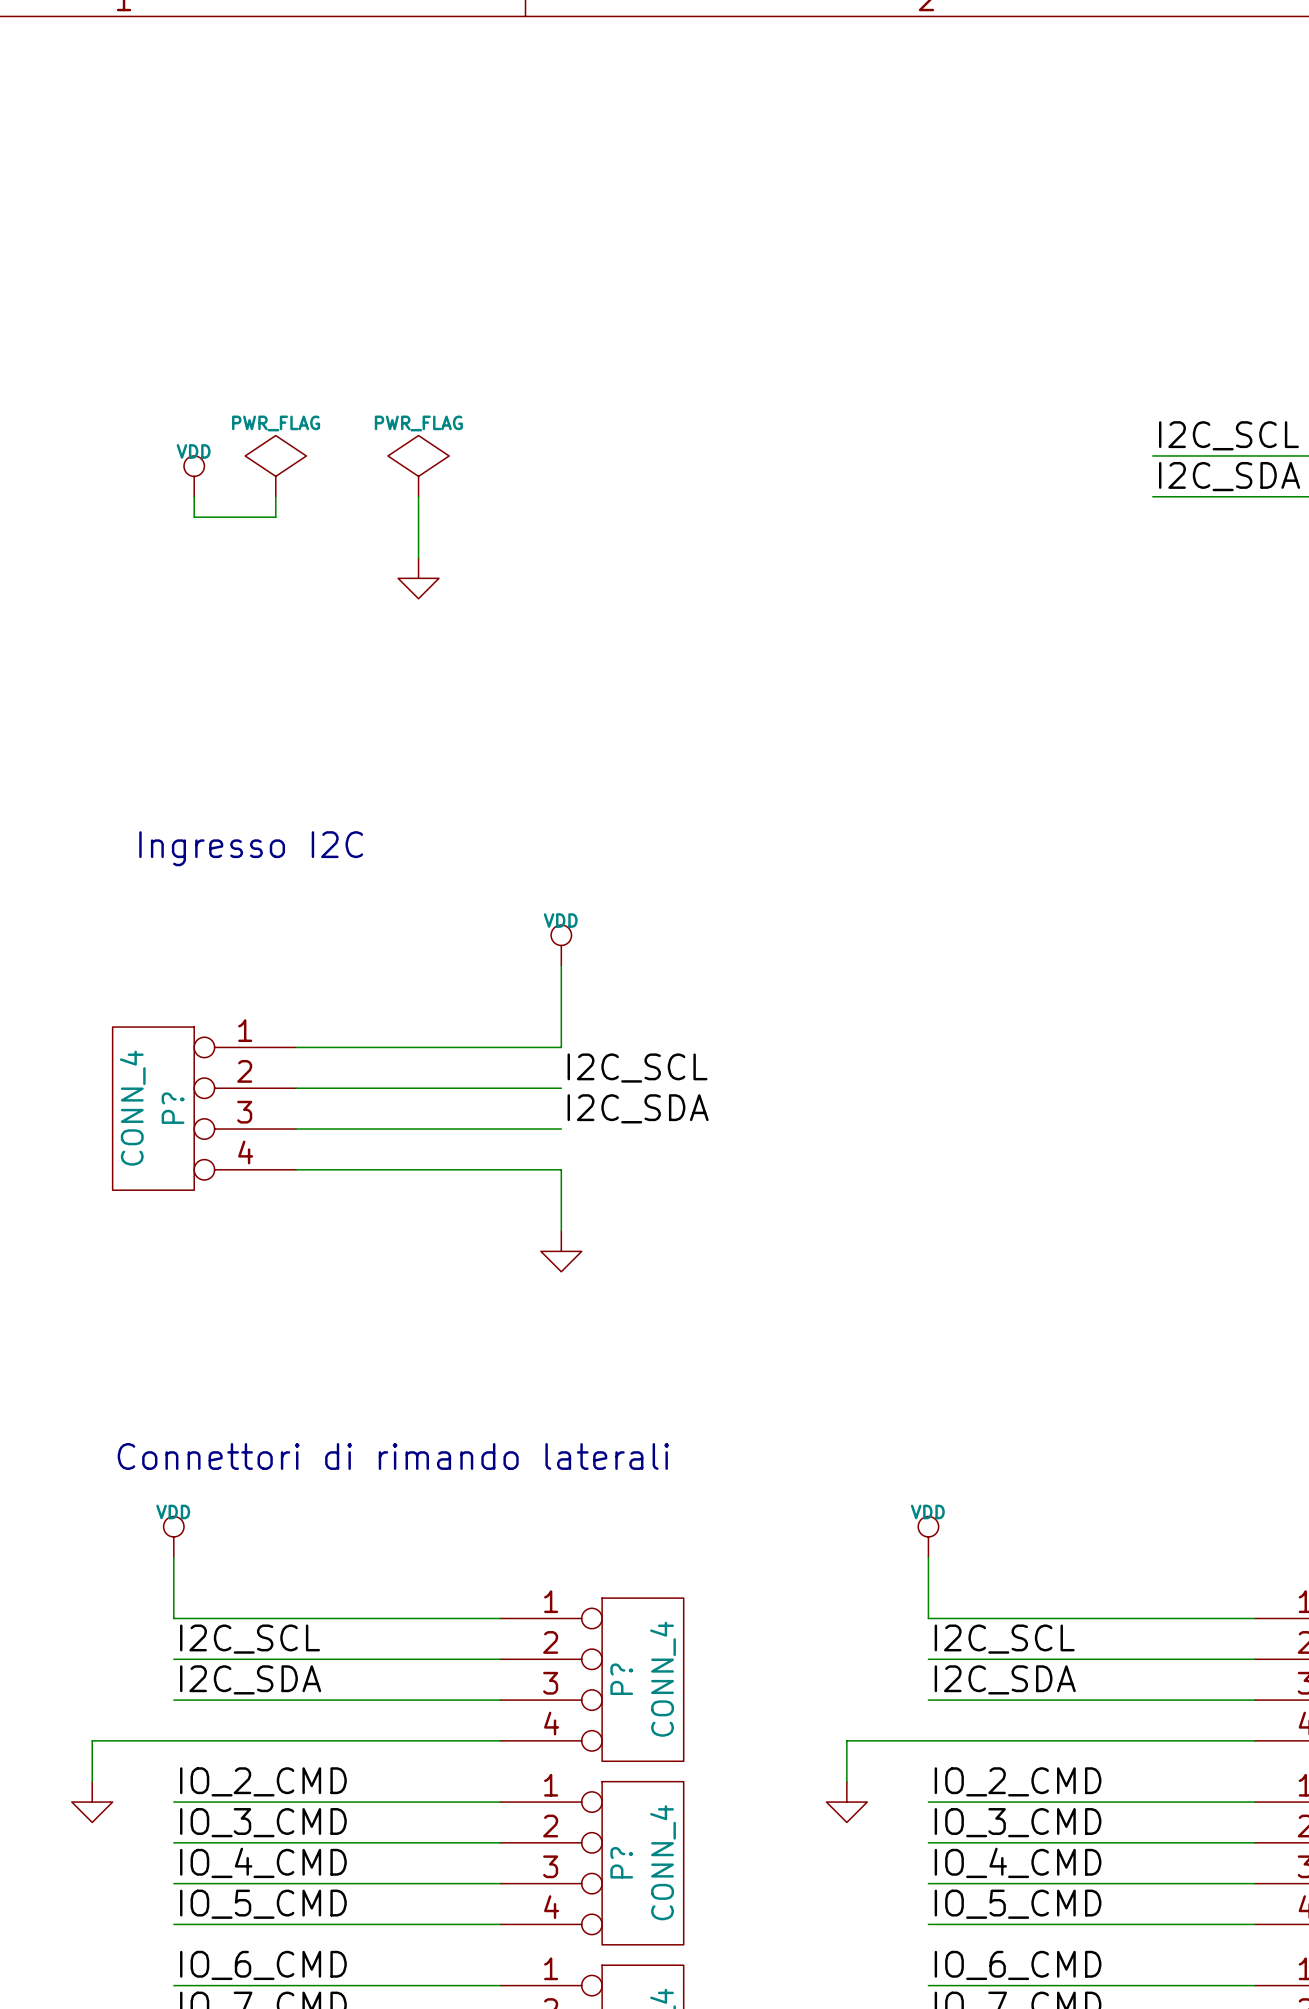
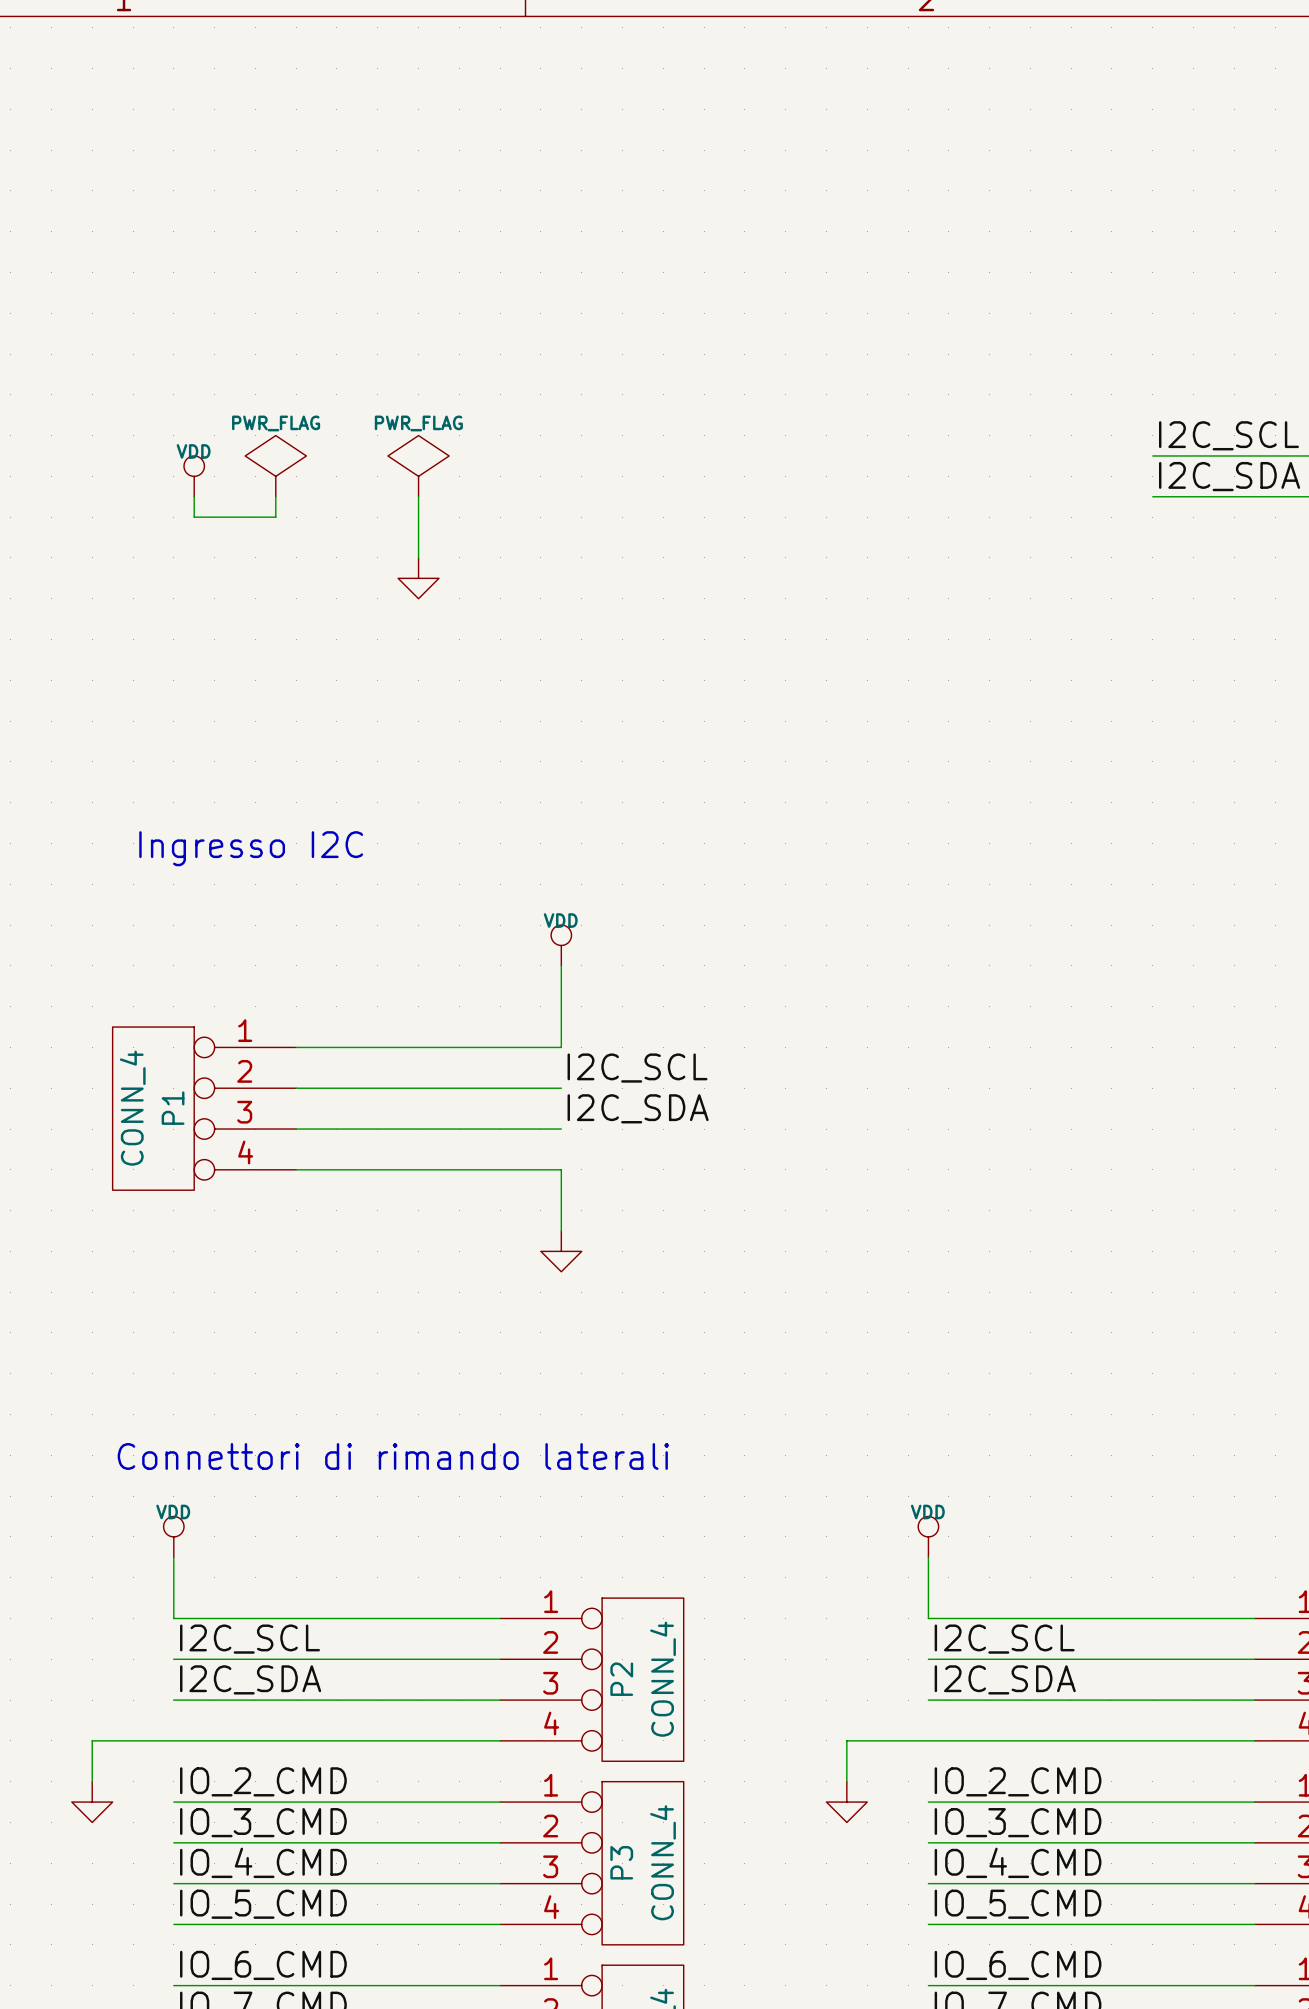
P? name: P? (173, 1108) -> P1 (173, 1108)
P? name: P? (621, 1679) -> P2 (621, 1679)
P? name: P? (621, 1862) -> P3 (621, 1862)

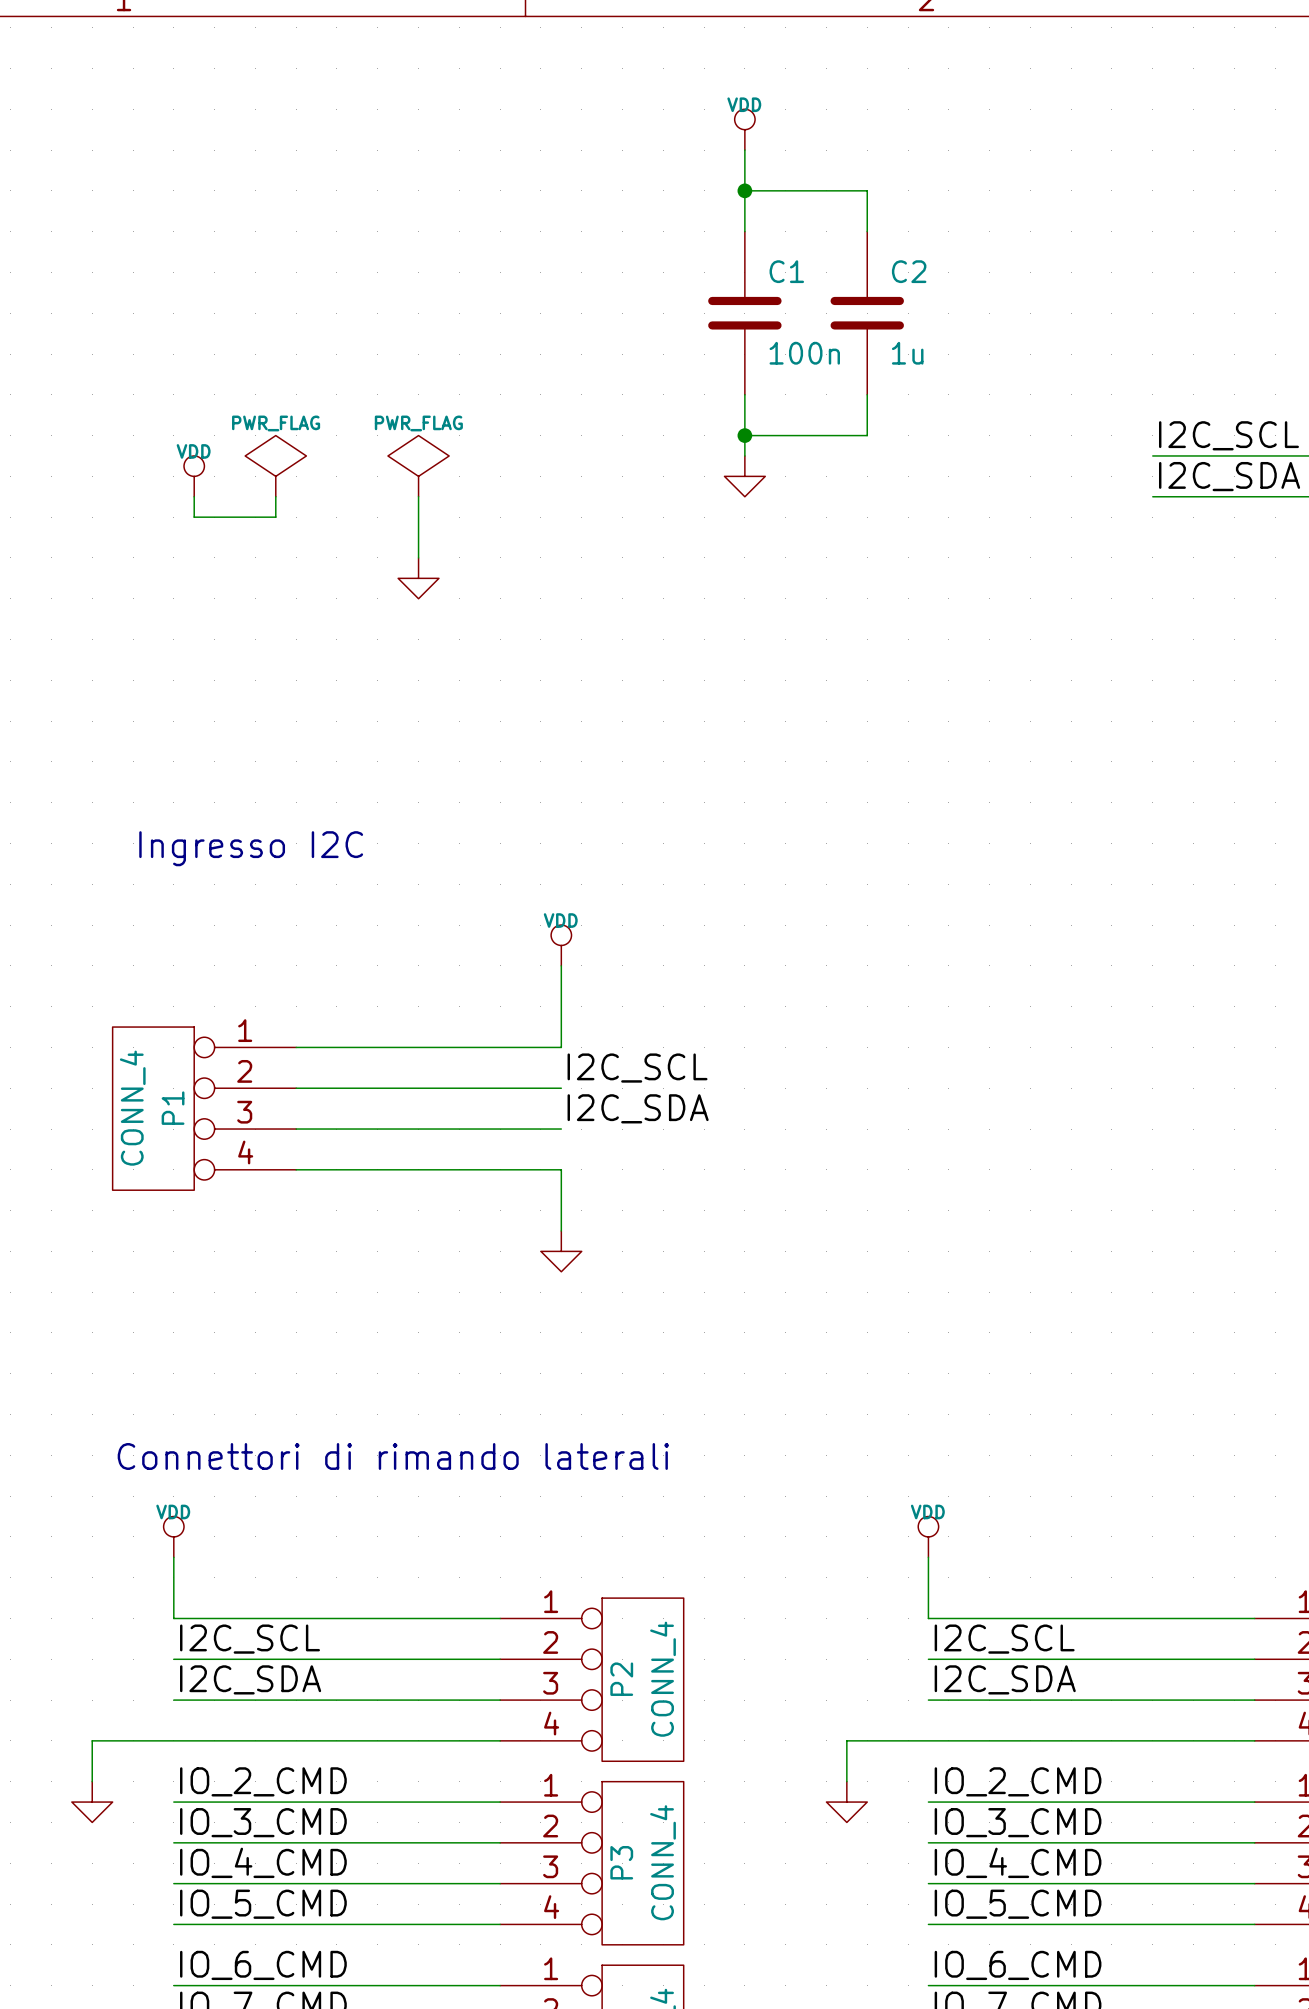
power symbol: none -> VDD (744, 129)
wire: none -> (744, 150) (744, 231)
wire: none -> (744, 190) (867, 190) (867, 231)
junction: none -> (744, 190)
C1: none -> 100n (744, 313)
C2: none -> 1u (867, 313)
wire: none -> (744, 394) (744, 455)
wire: none -> (867, 394) (867, 435) (744, 435)
junction: none -> (744, 435)
power symbol: none -> (744, 476)

